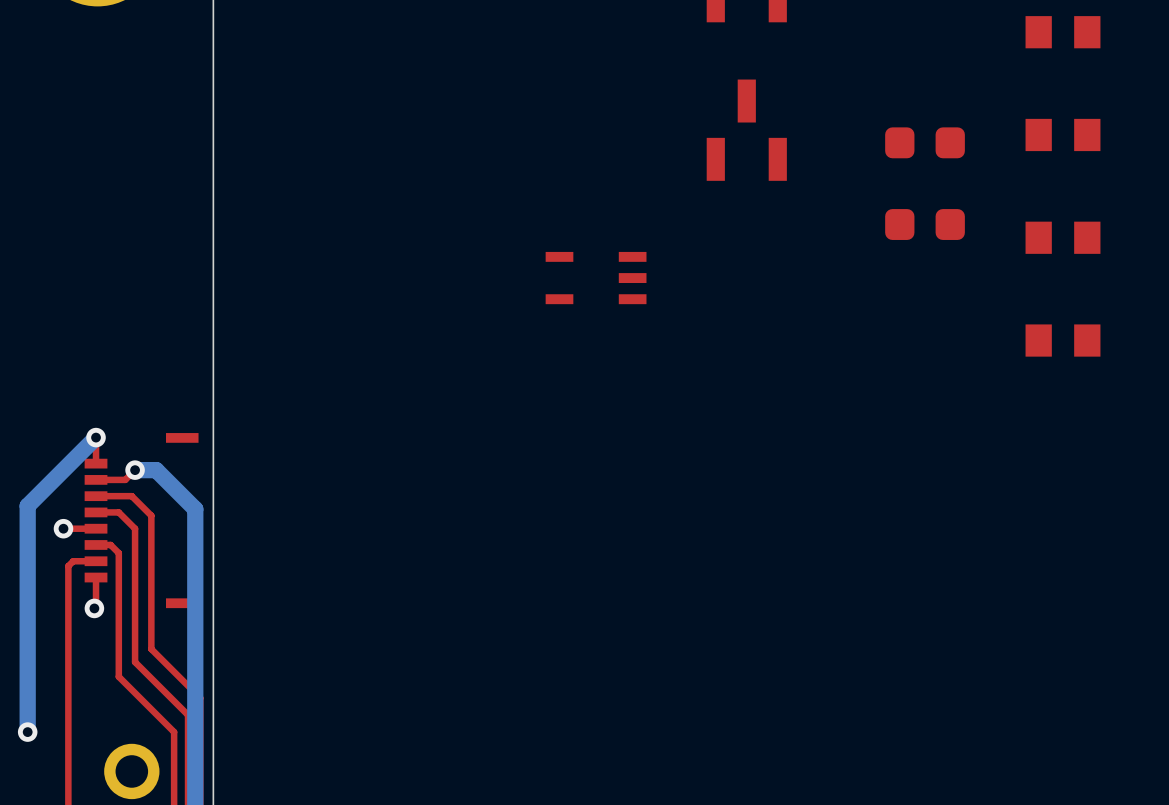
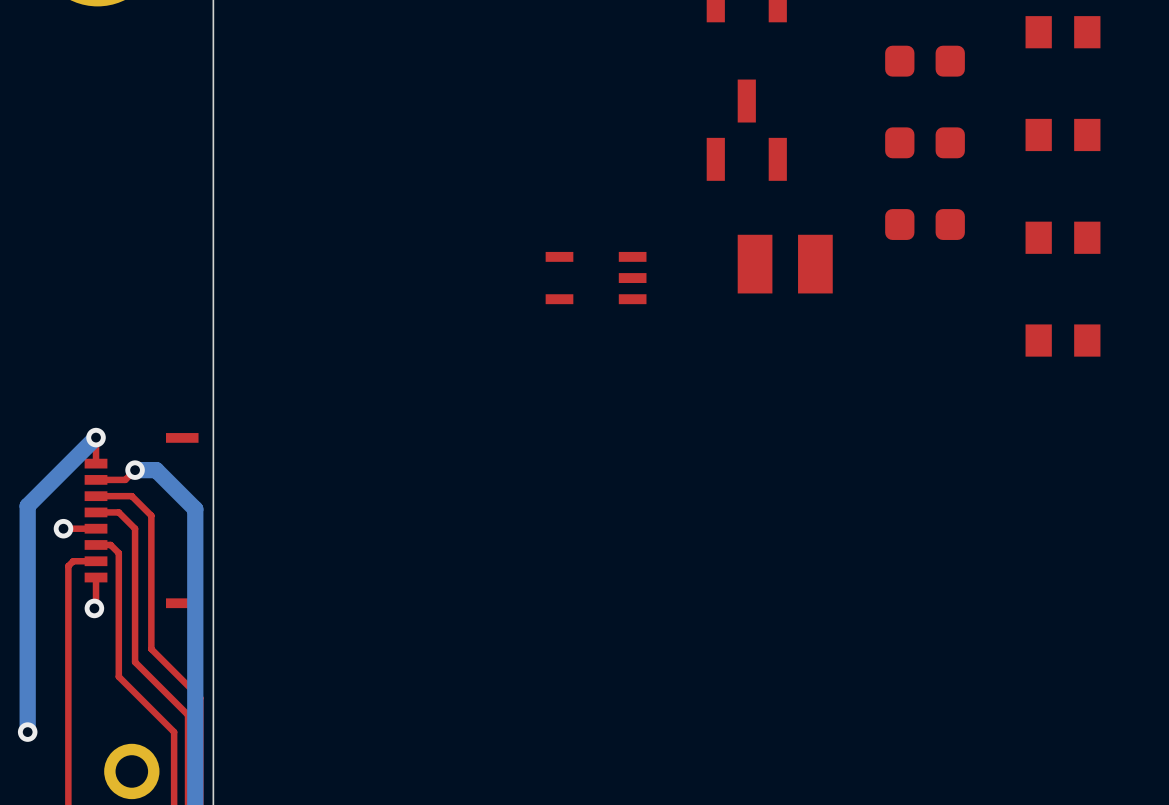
part: none -> (925, 61)
part: none -> (785, 264)

